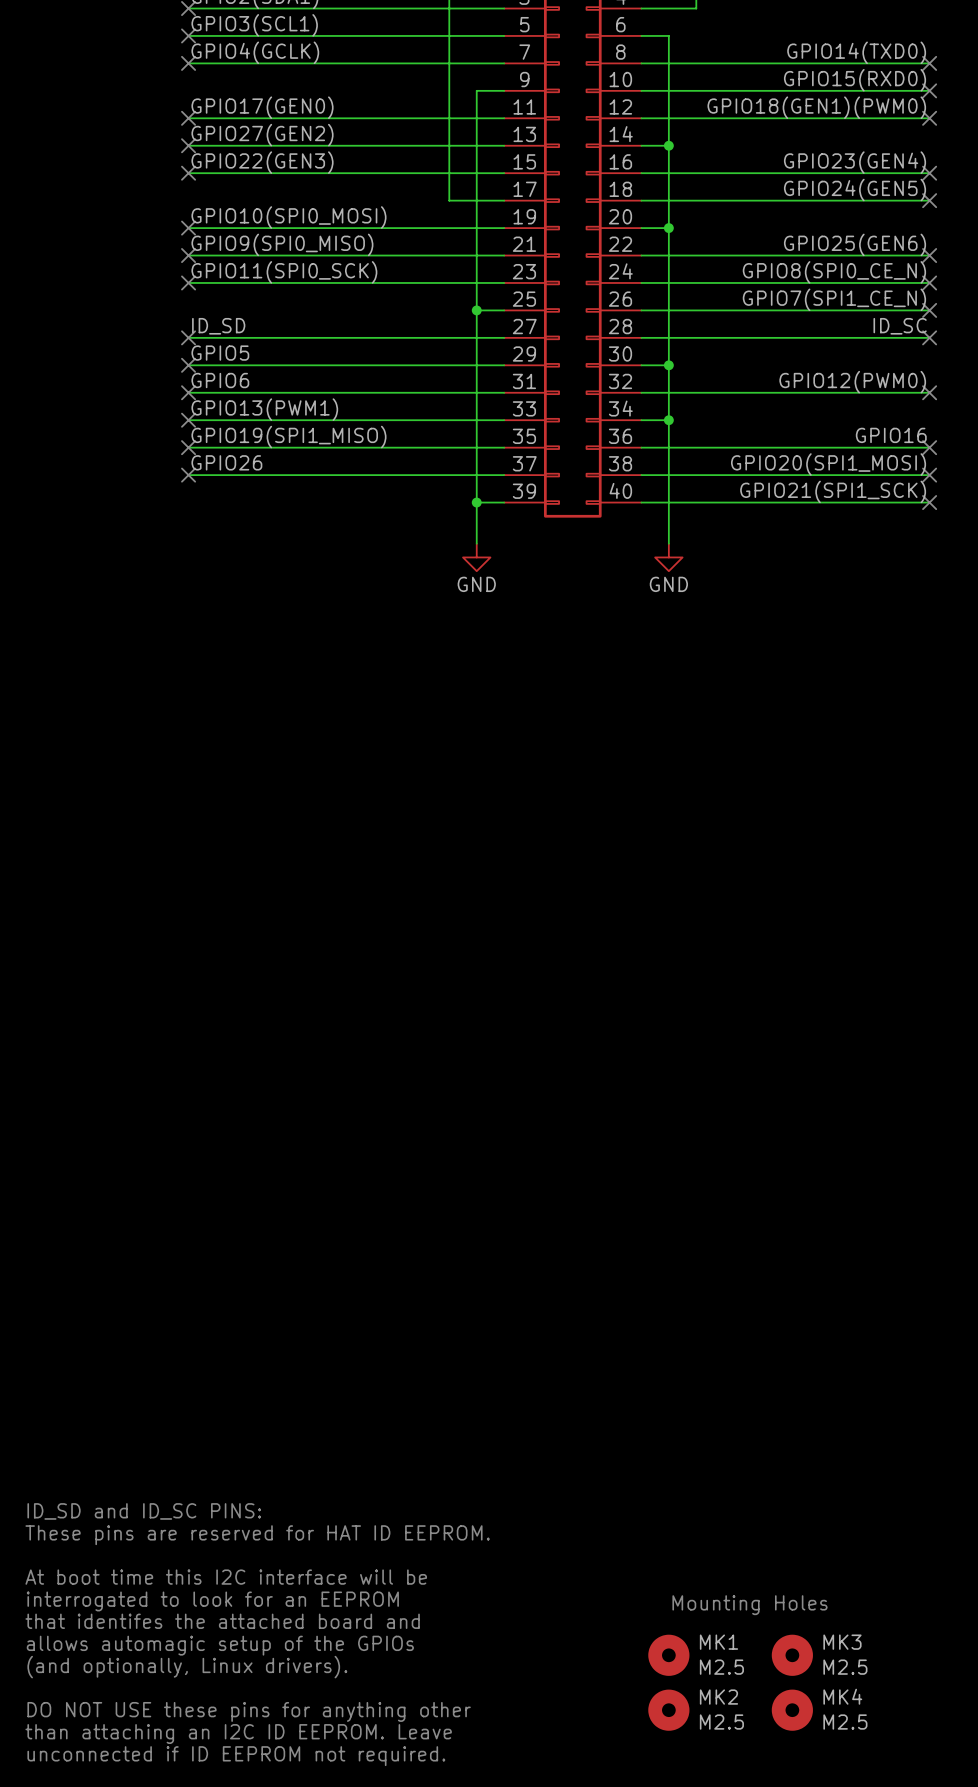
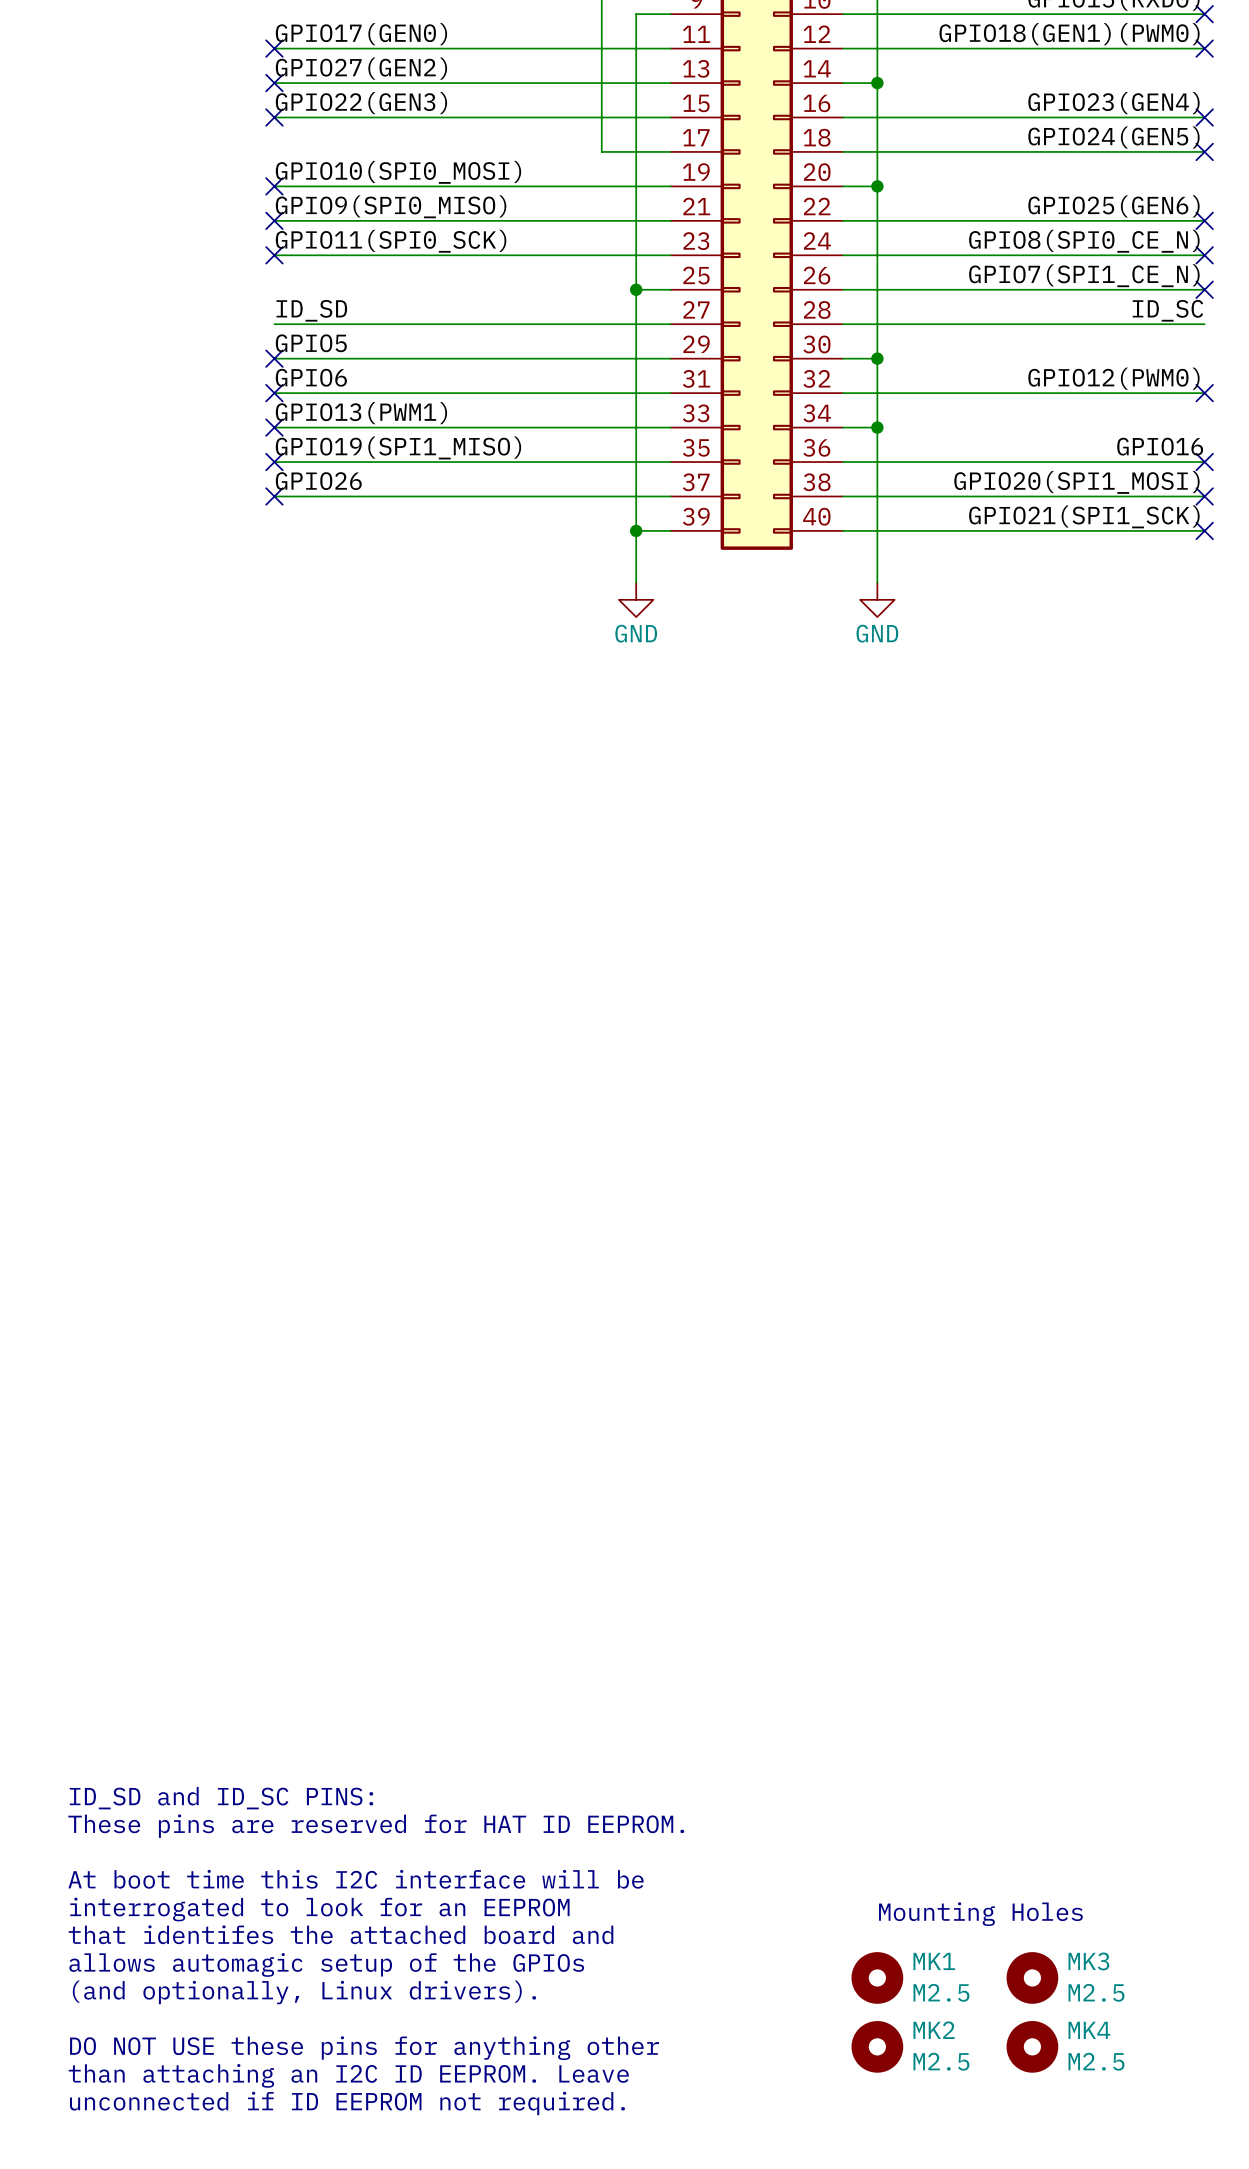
no-connect mark: (188, 337) -> none
no-connect mark: (929, 337) -> none

